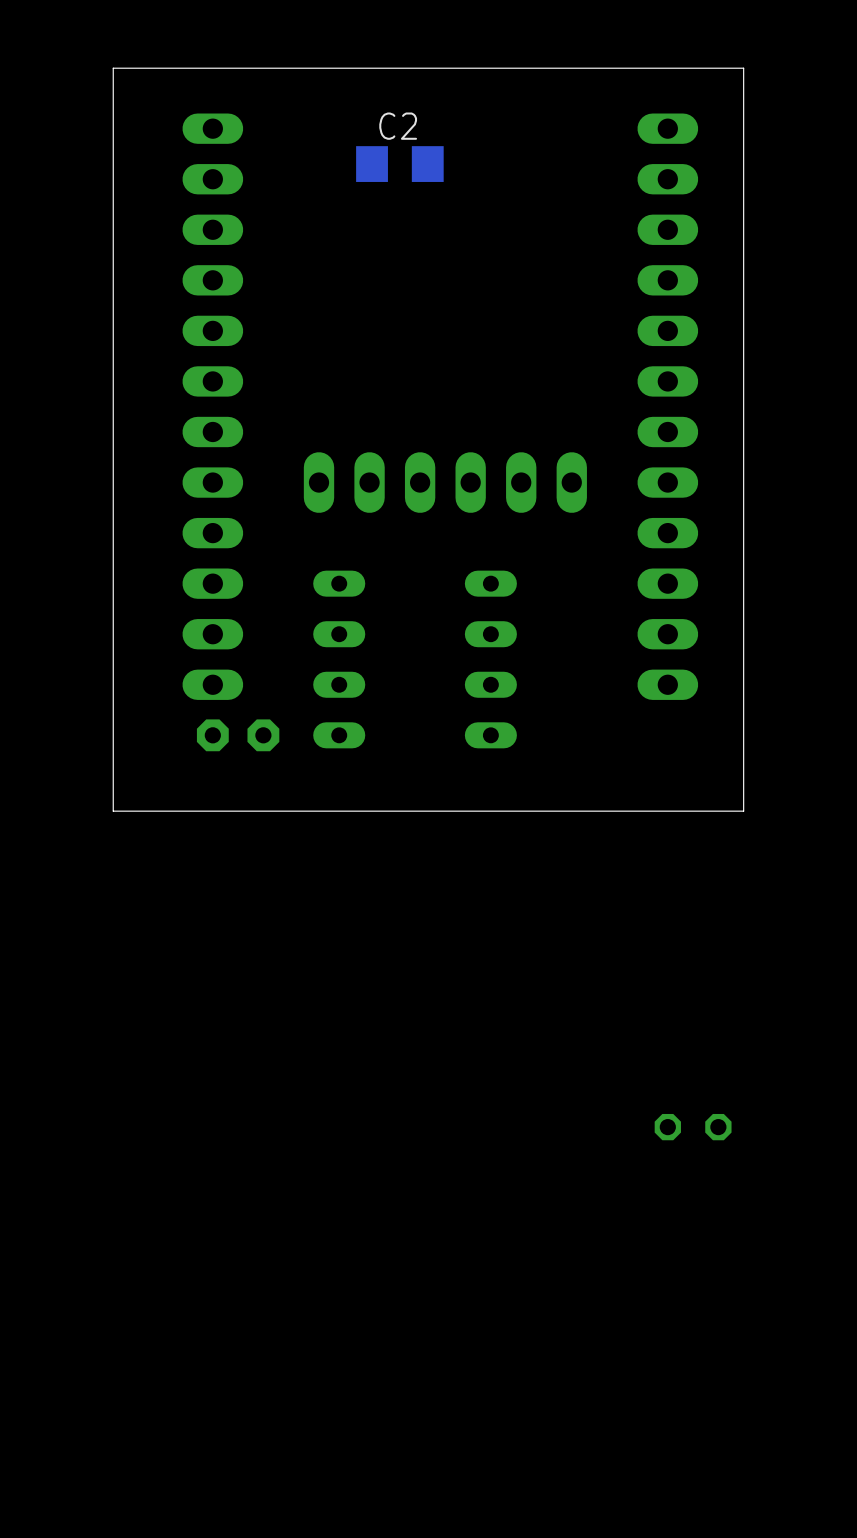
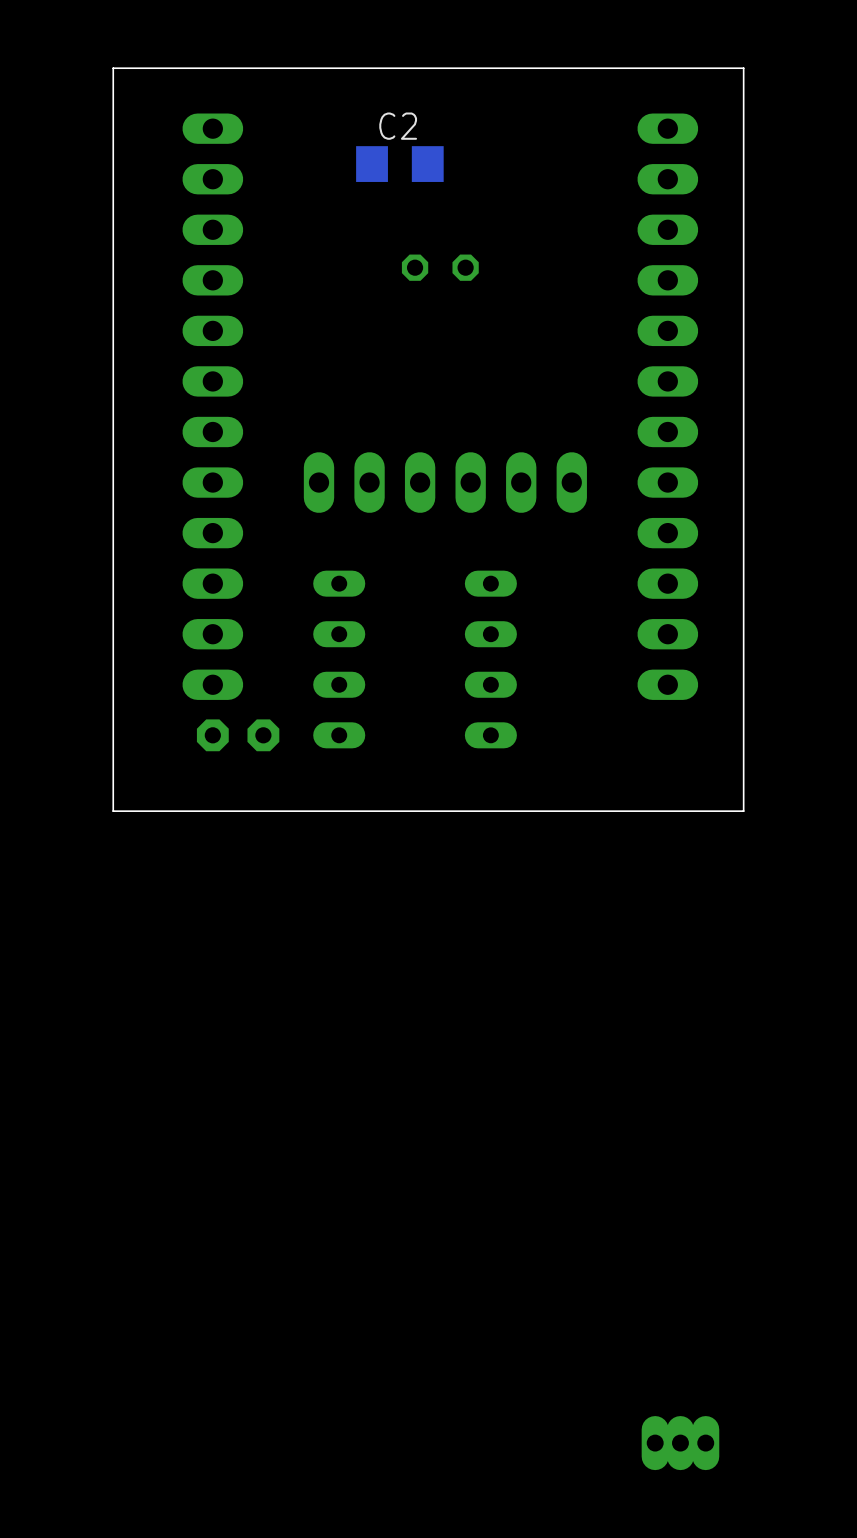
part: none -> (440, 267)
part: (693, 1127) -> none
part: none -> (680, 1443)

